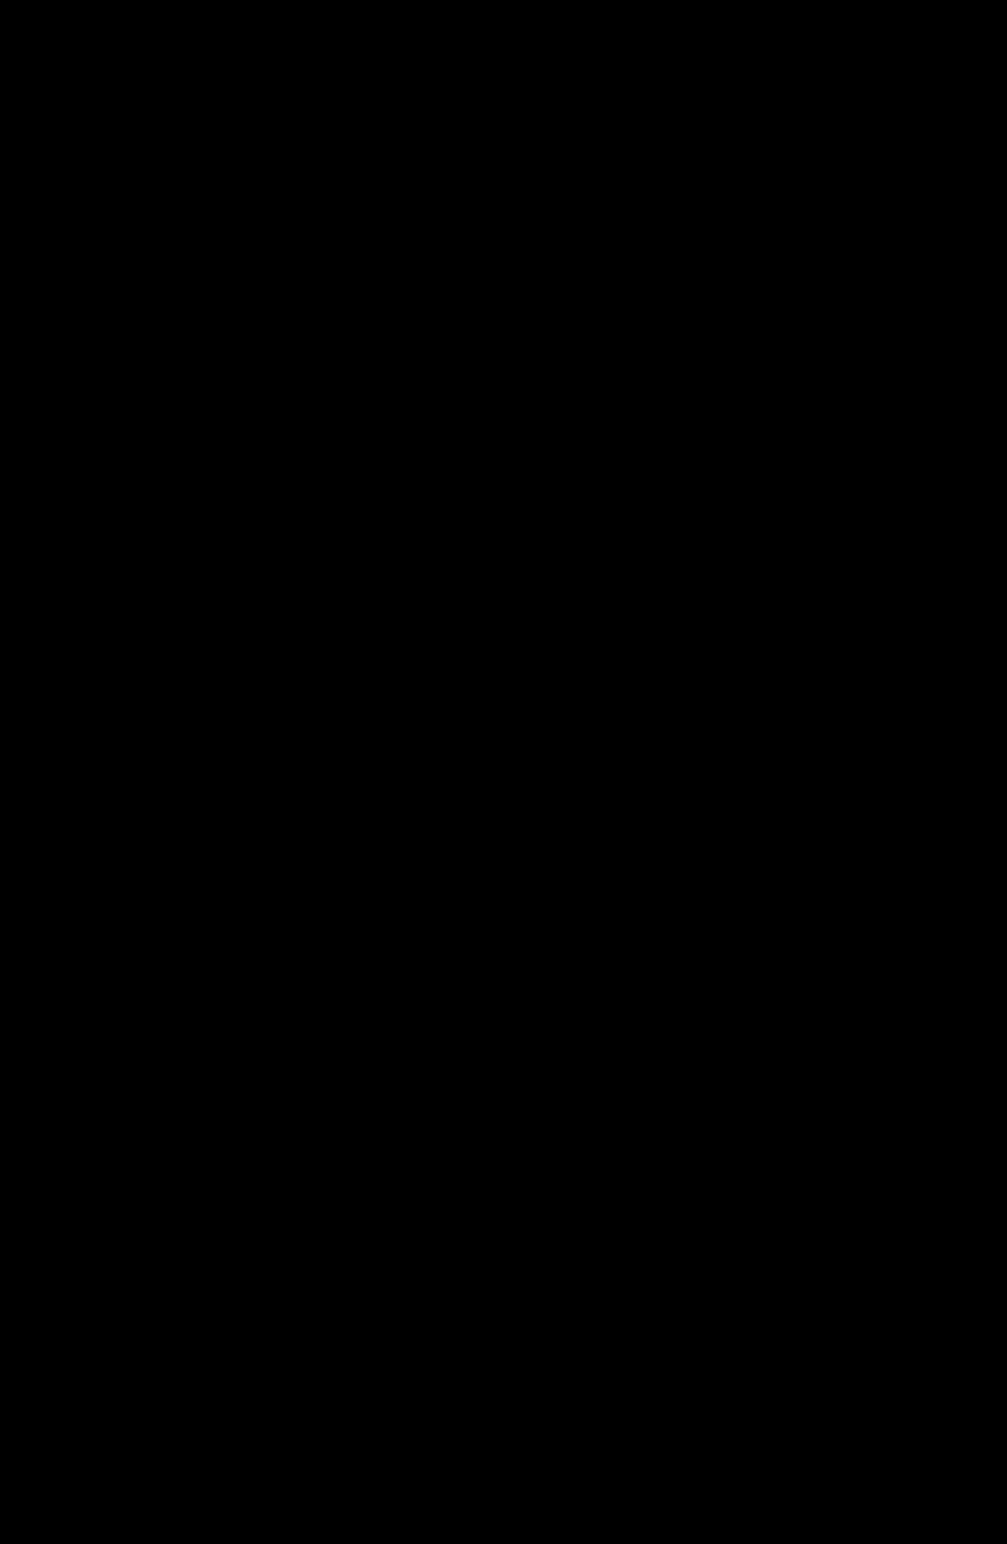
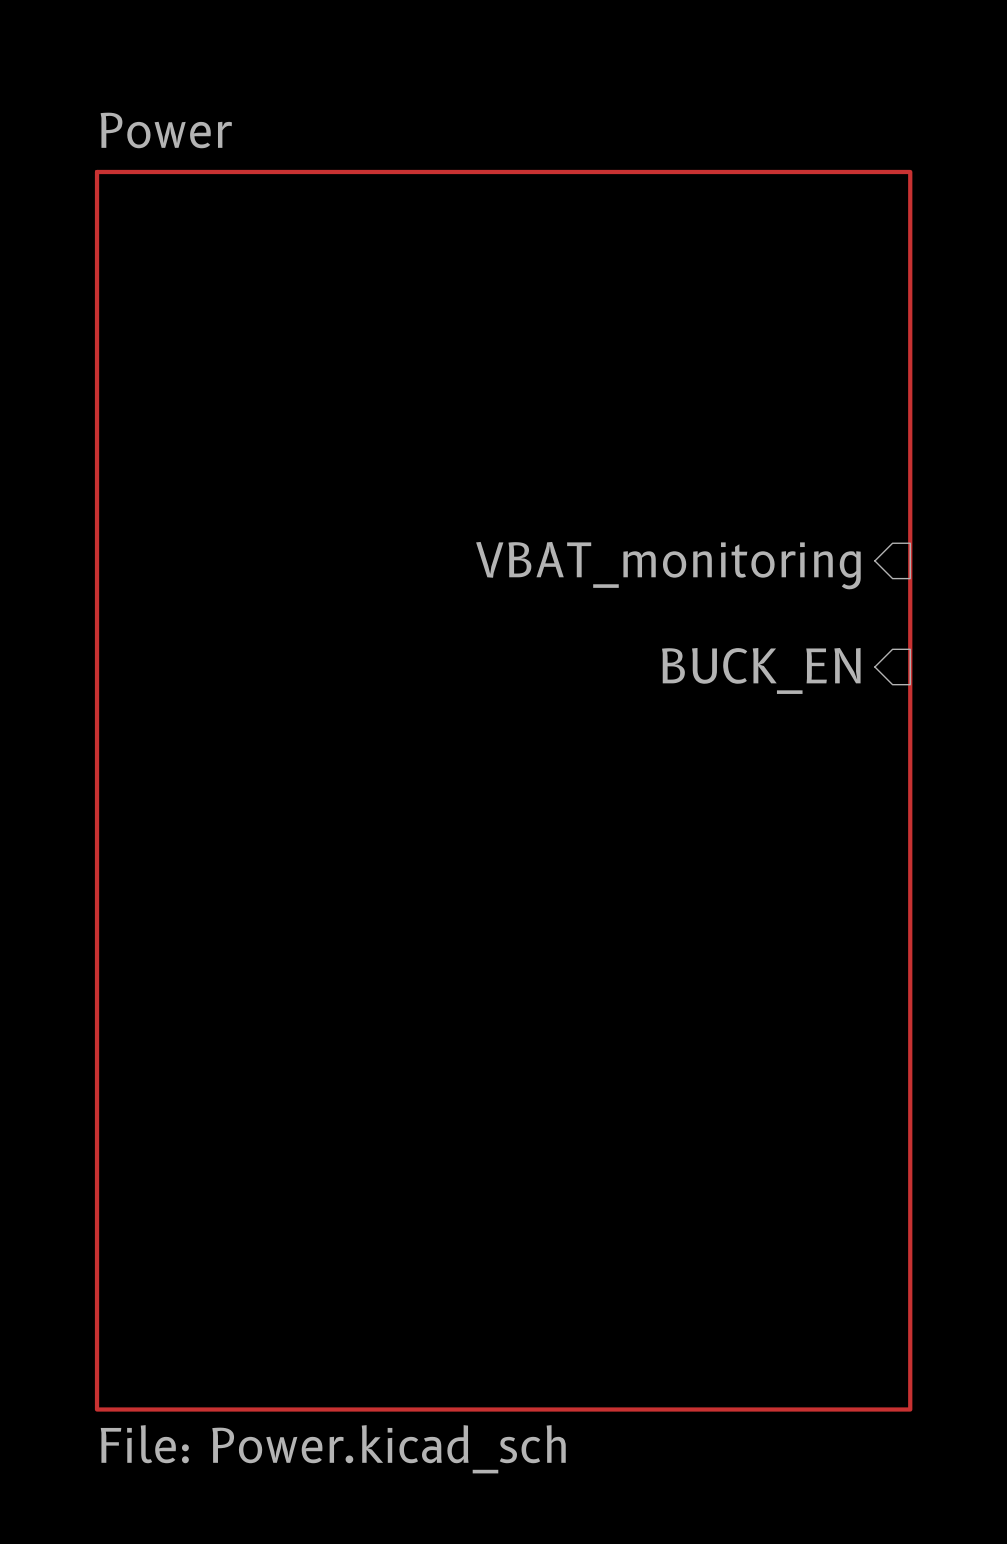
sheet pin: none -> VBAT_monitoring (668, 565)
sheet pin: none -> BUCK_EN (761, 670)
sheet Power: none -> File: Power.kicad_sch (503, 790)

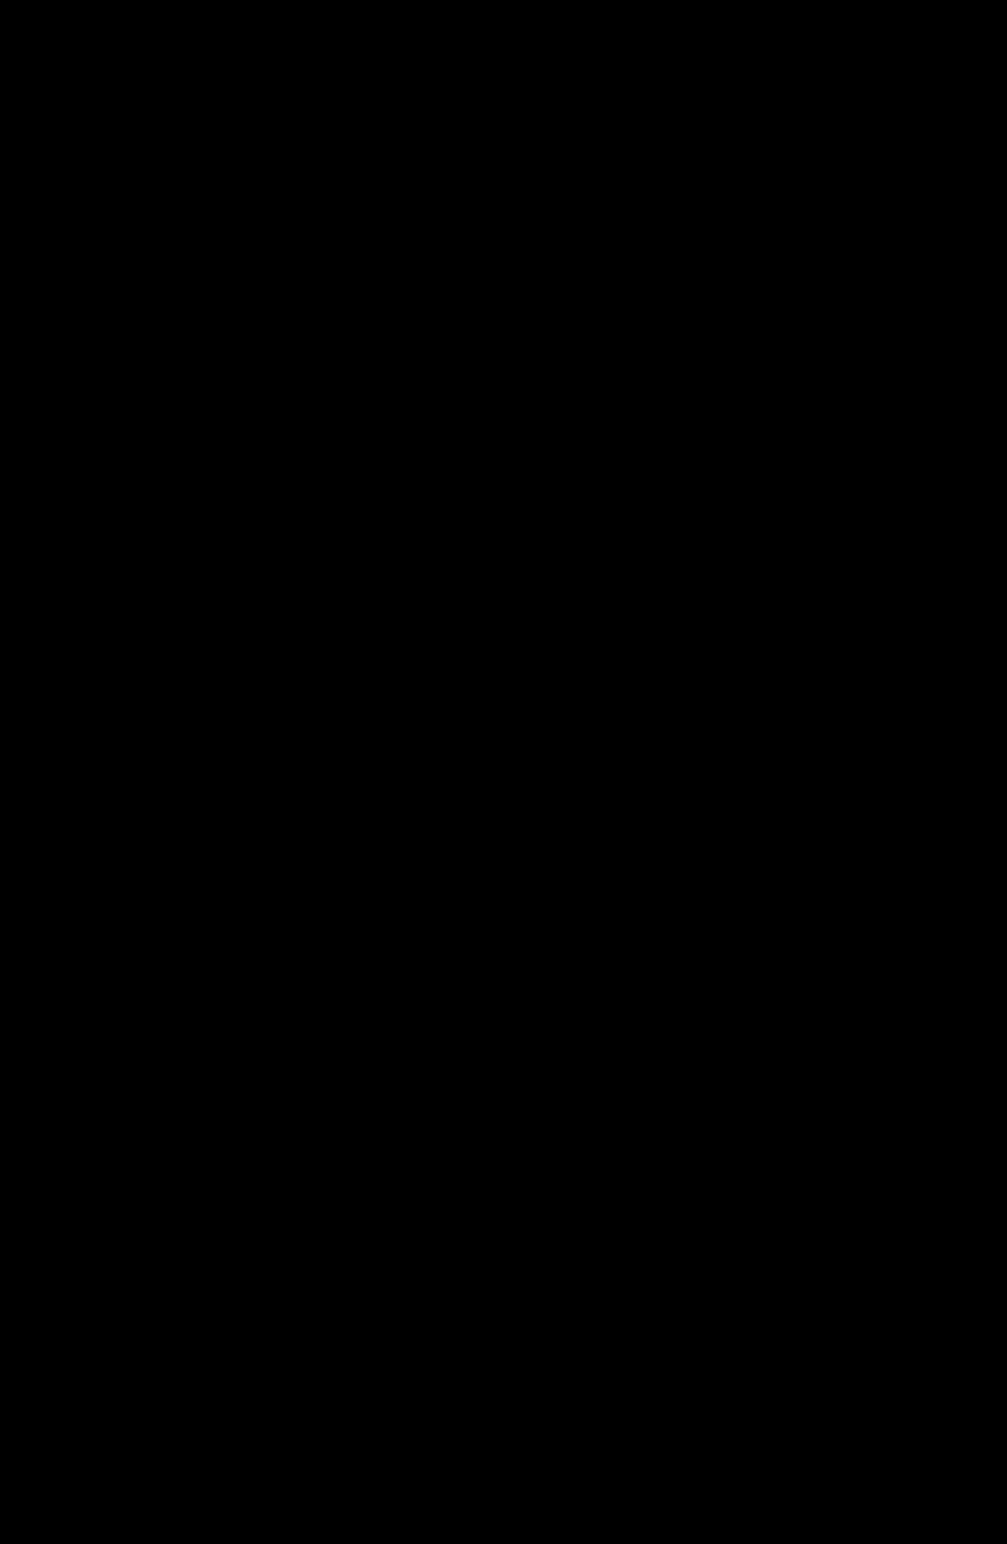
sheet pin: VBAT_monitoring (668, 565) -> none
sheet pin: BUCK_EN (761, 670) -> none
sheet Power: File: Power.kicad_sch (503, 790) -> none

